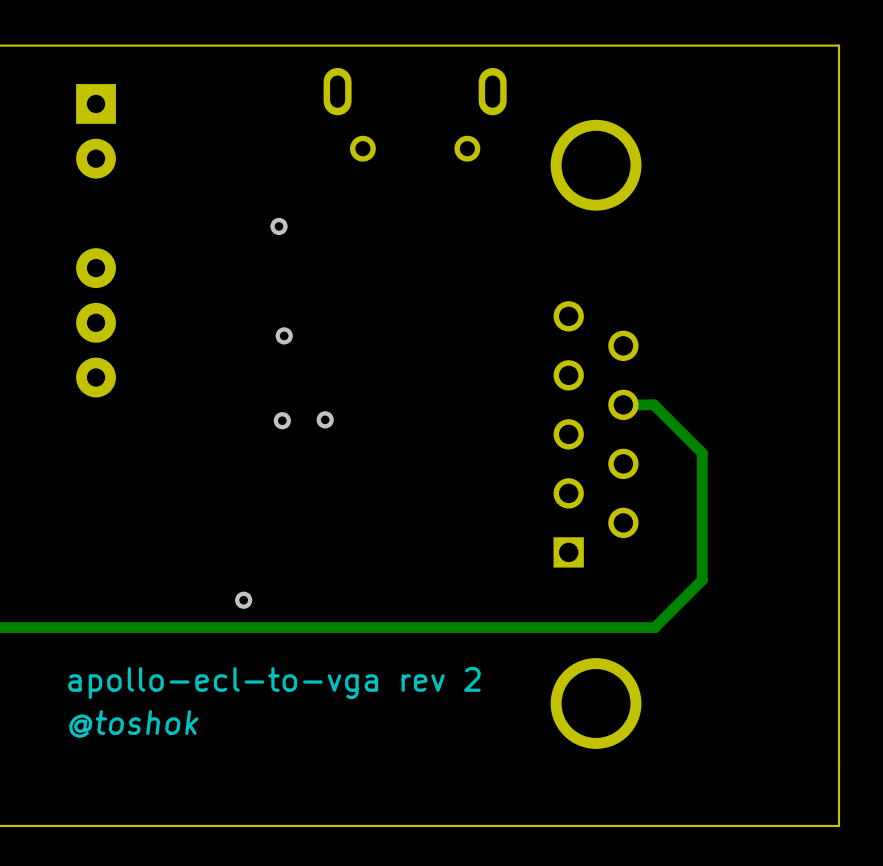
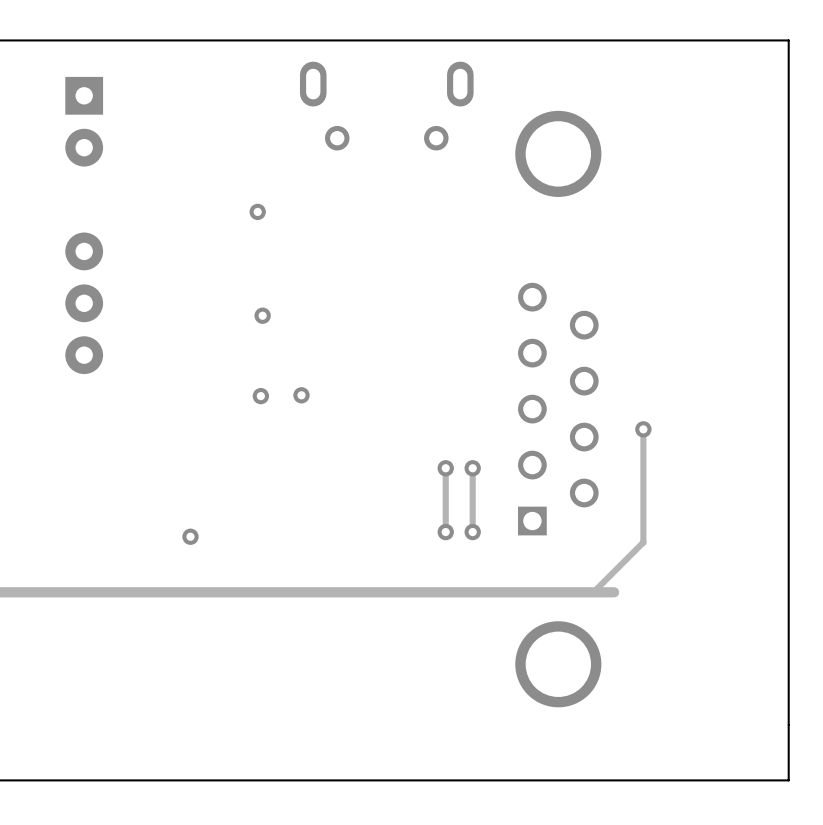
track: (623, 404) (653, 404) (702, 453) (702, 580) (654, 627) -> none
track: none -> (643, 429) (643, 542) (593, 592)
via: none -> (643, 429)
track: none -> (445, 468) (445, 532)
via: none -> (445, 468)
track: none -> (472, 468) (472, 532)
via: none -> (472, 468)
via: none -> (445, 532)
via: none -> (472, 532)
via position: (243, 600) -> (190, 536)
text: apollo-ecl-to-vga rev 2 (274, 683) -> none
text: @toshok (133, 724) -> none

